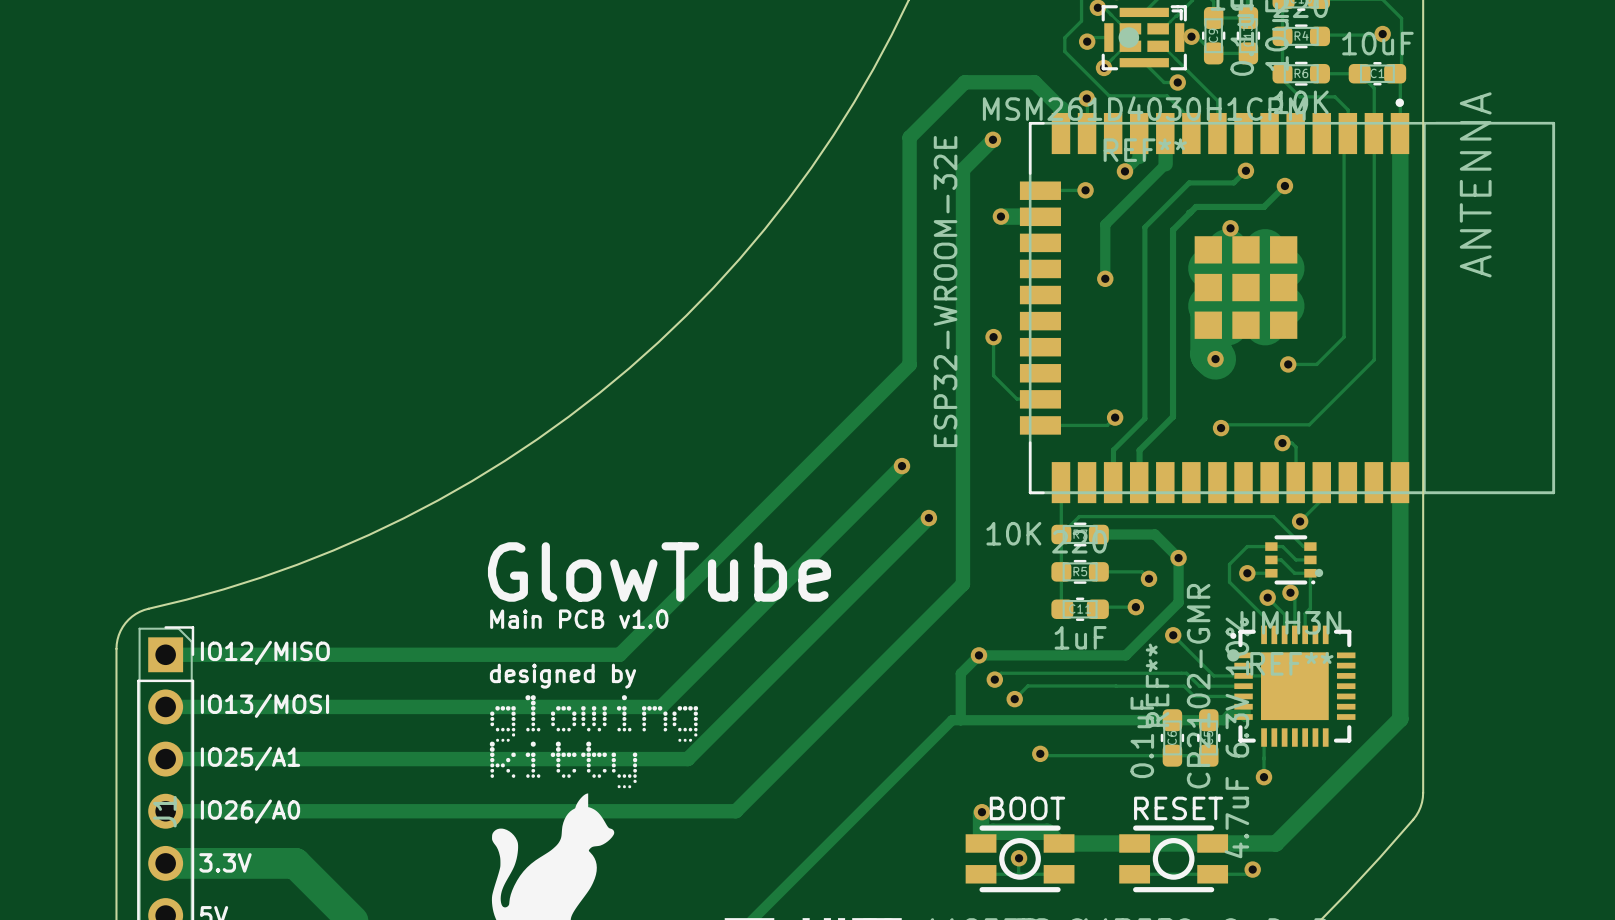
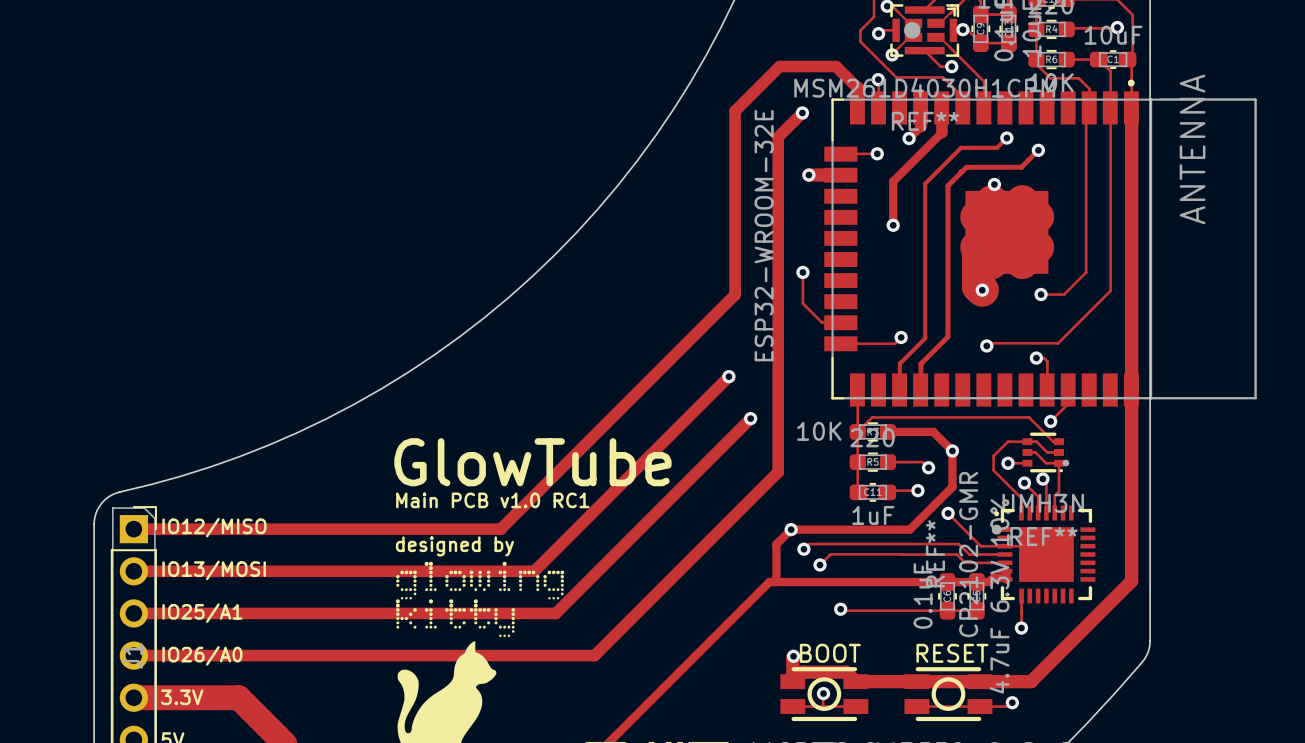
text: Main PCB v1.0 (579, 619) -> Main PCB v1.0 RC1 (492, 500)

